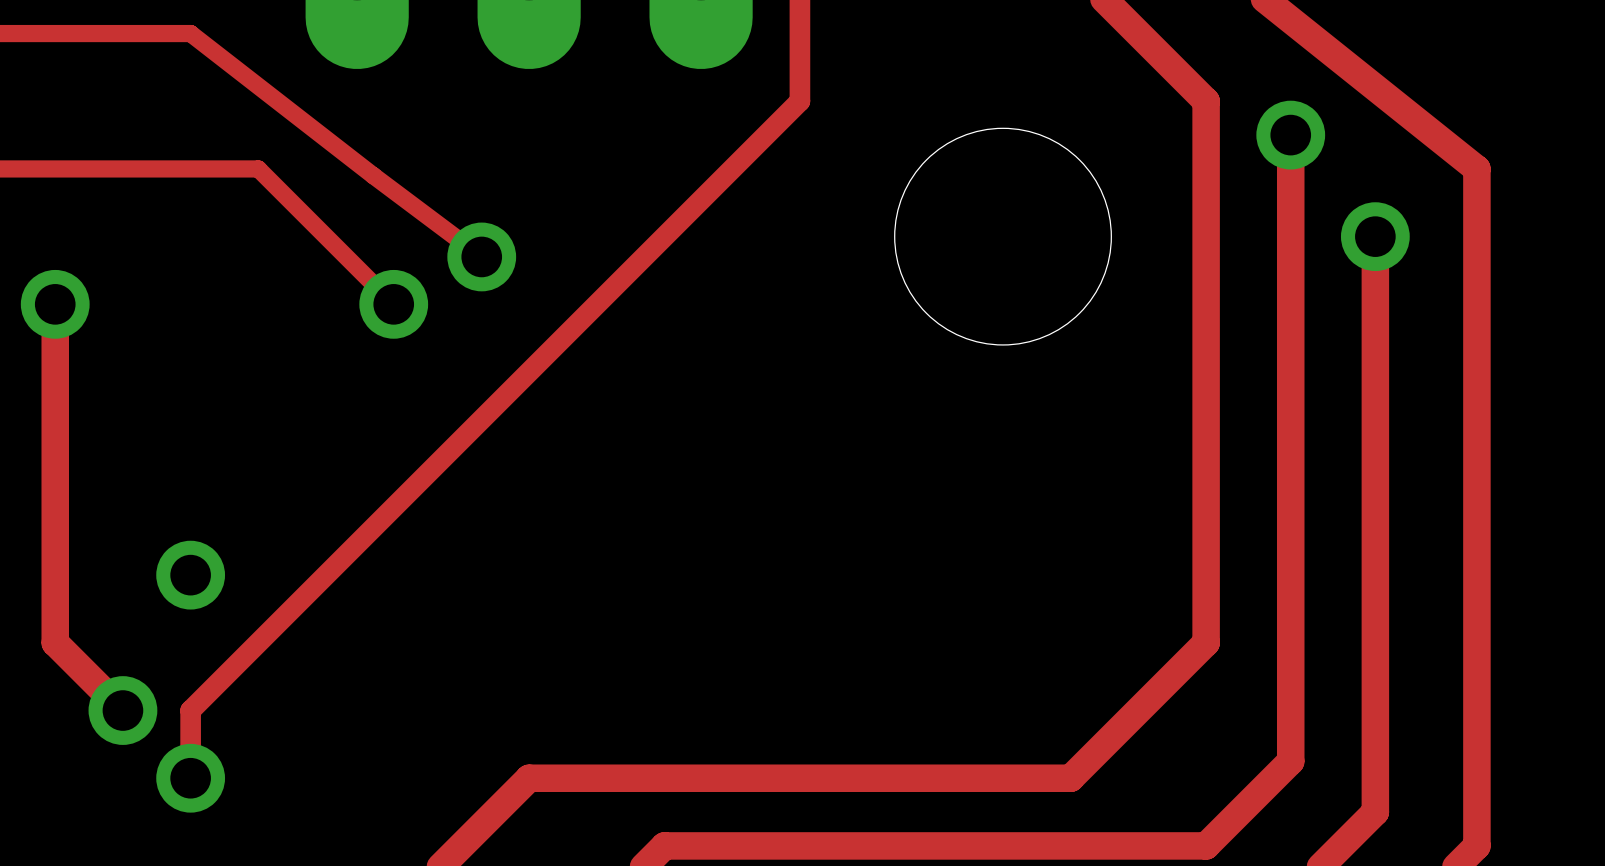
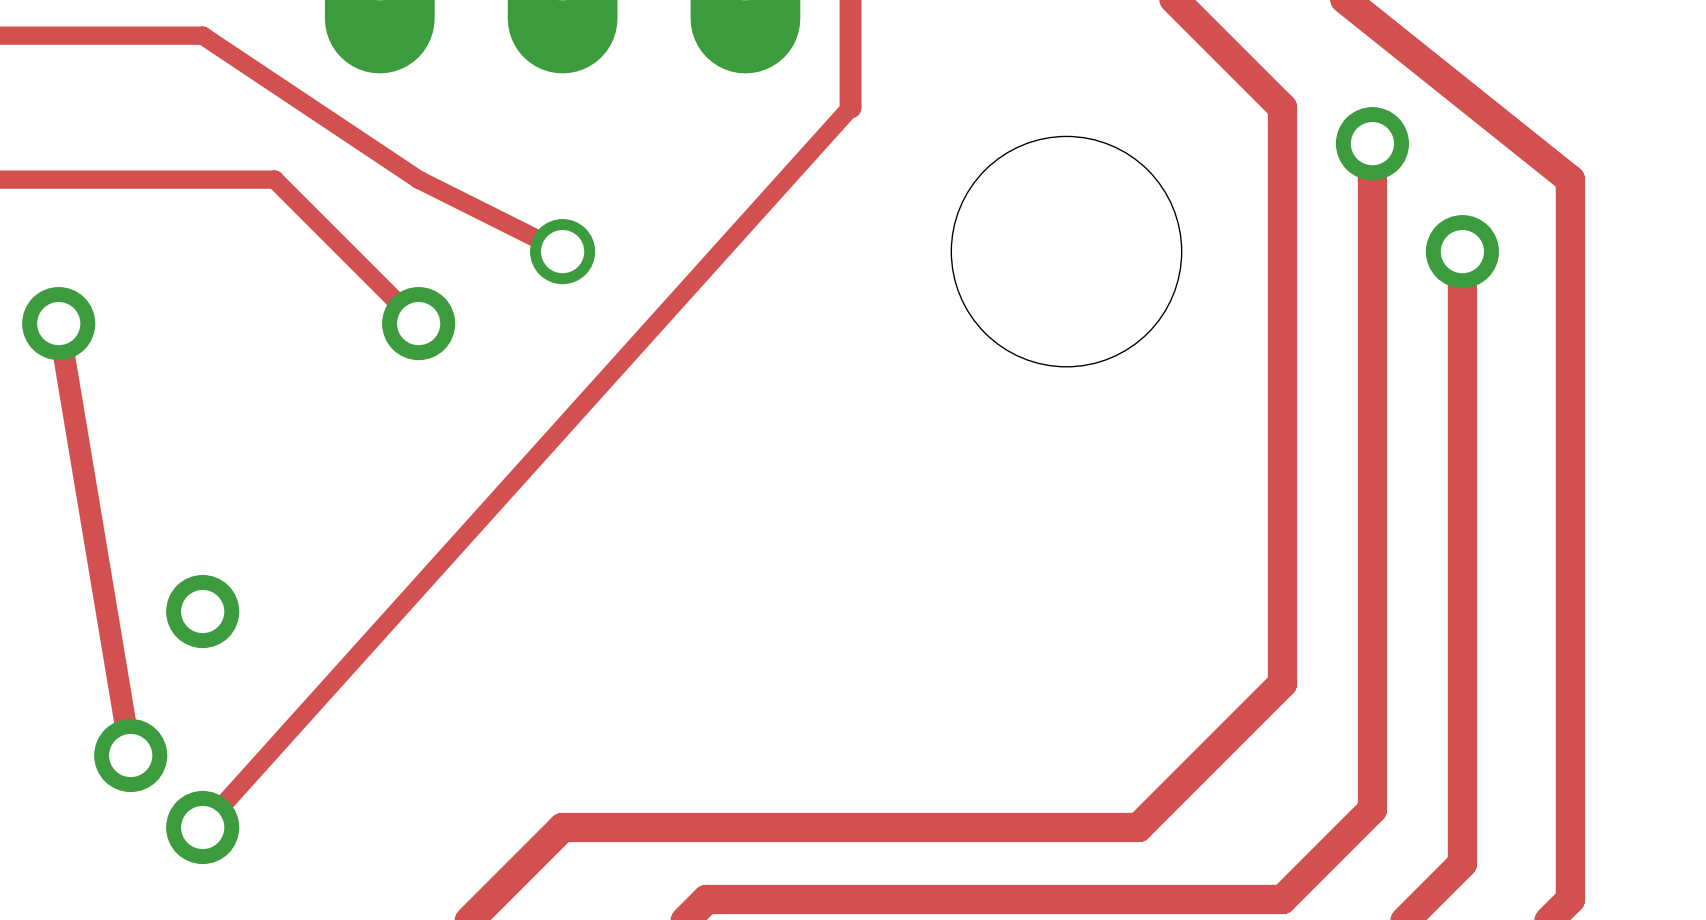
track: (190, 33) (481, 256) -> (202, 35) (418, 179) (562, 251)
track: (799, 101) (190, 710) (190, 778) -> (850, 107) (202, 827)
via position: (481, 256) -> (562, 251)
track: (55, 304) (55, 642) (122, 710) -> (58, 323) (130, 755)

